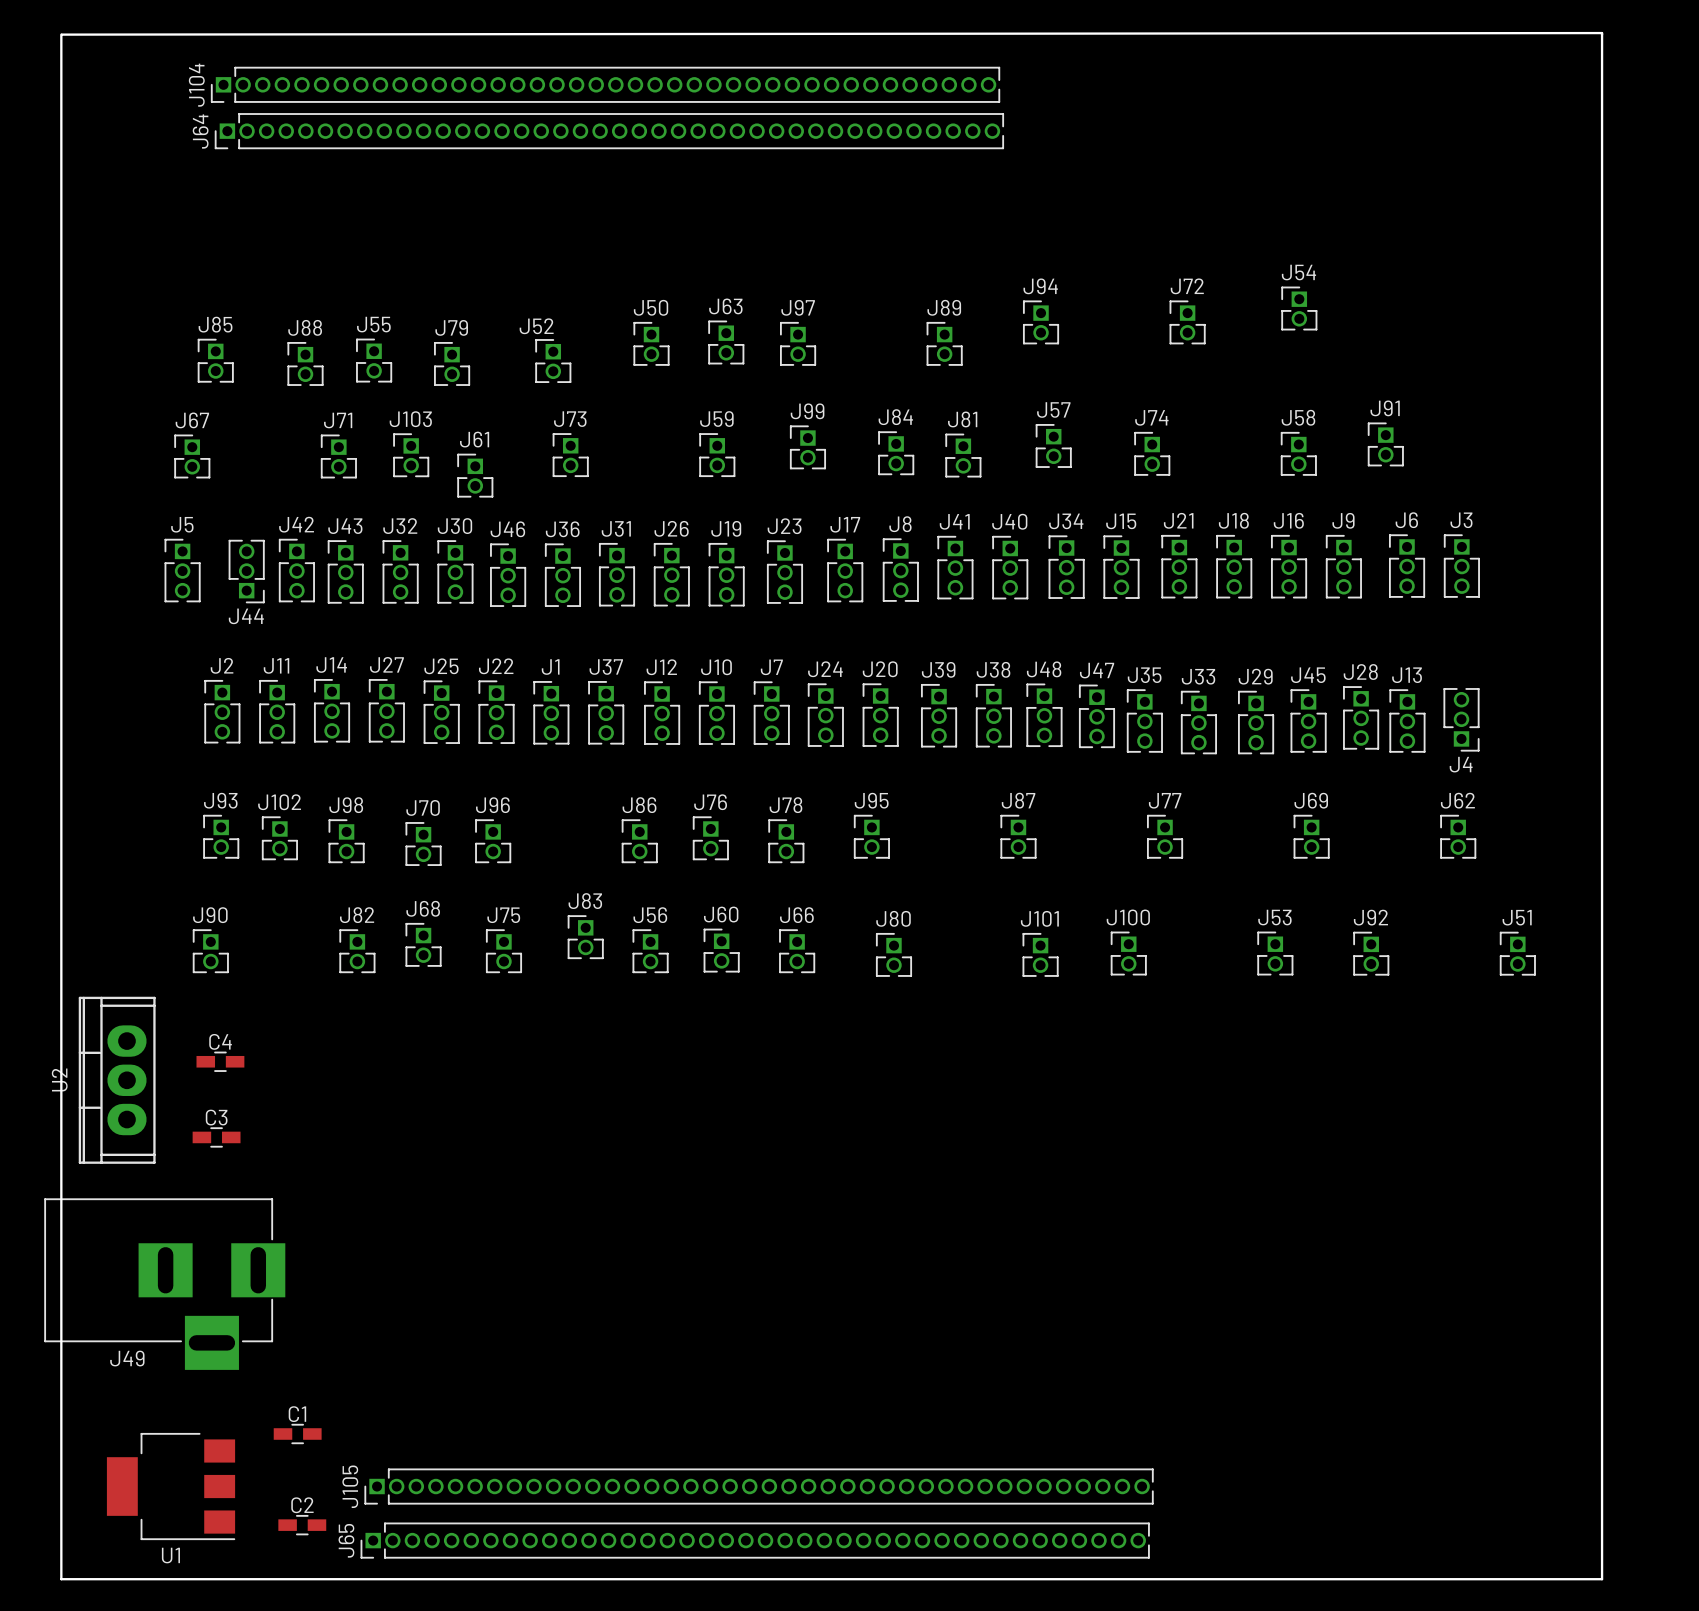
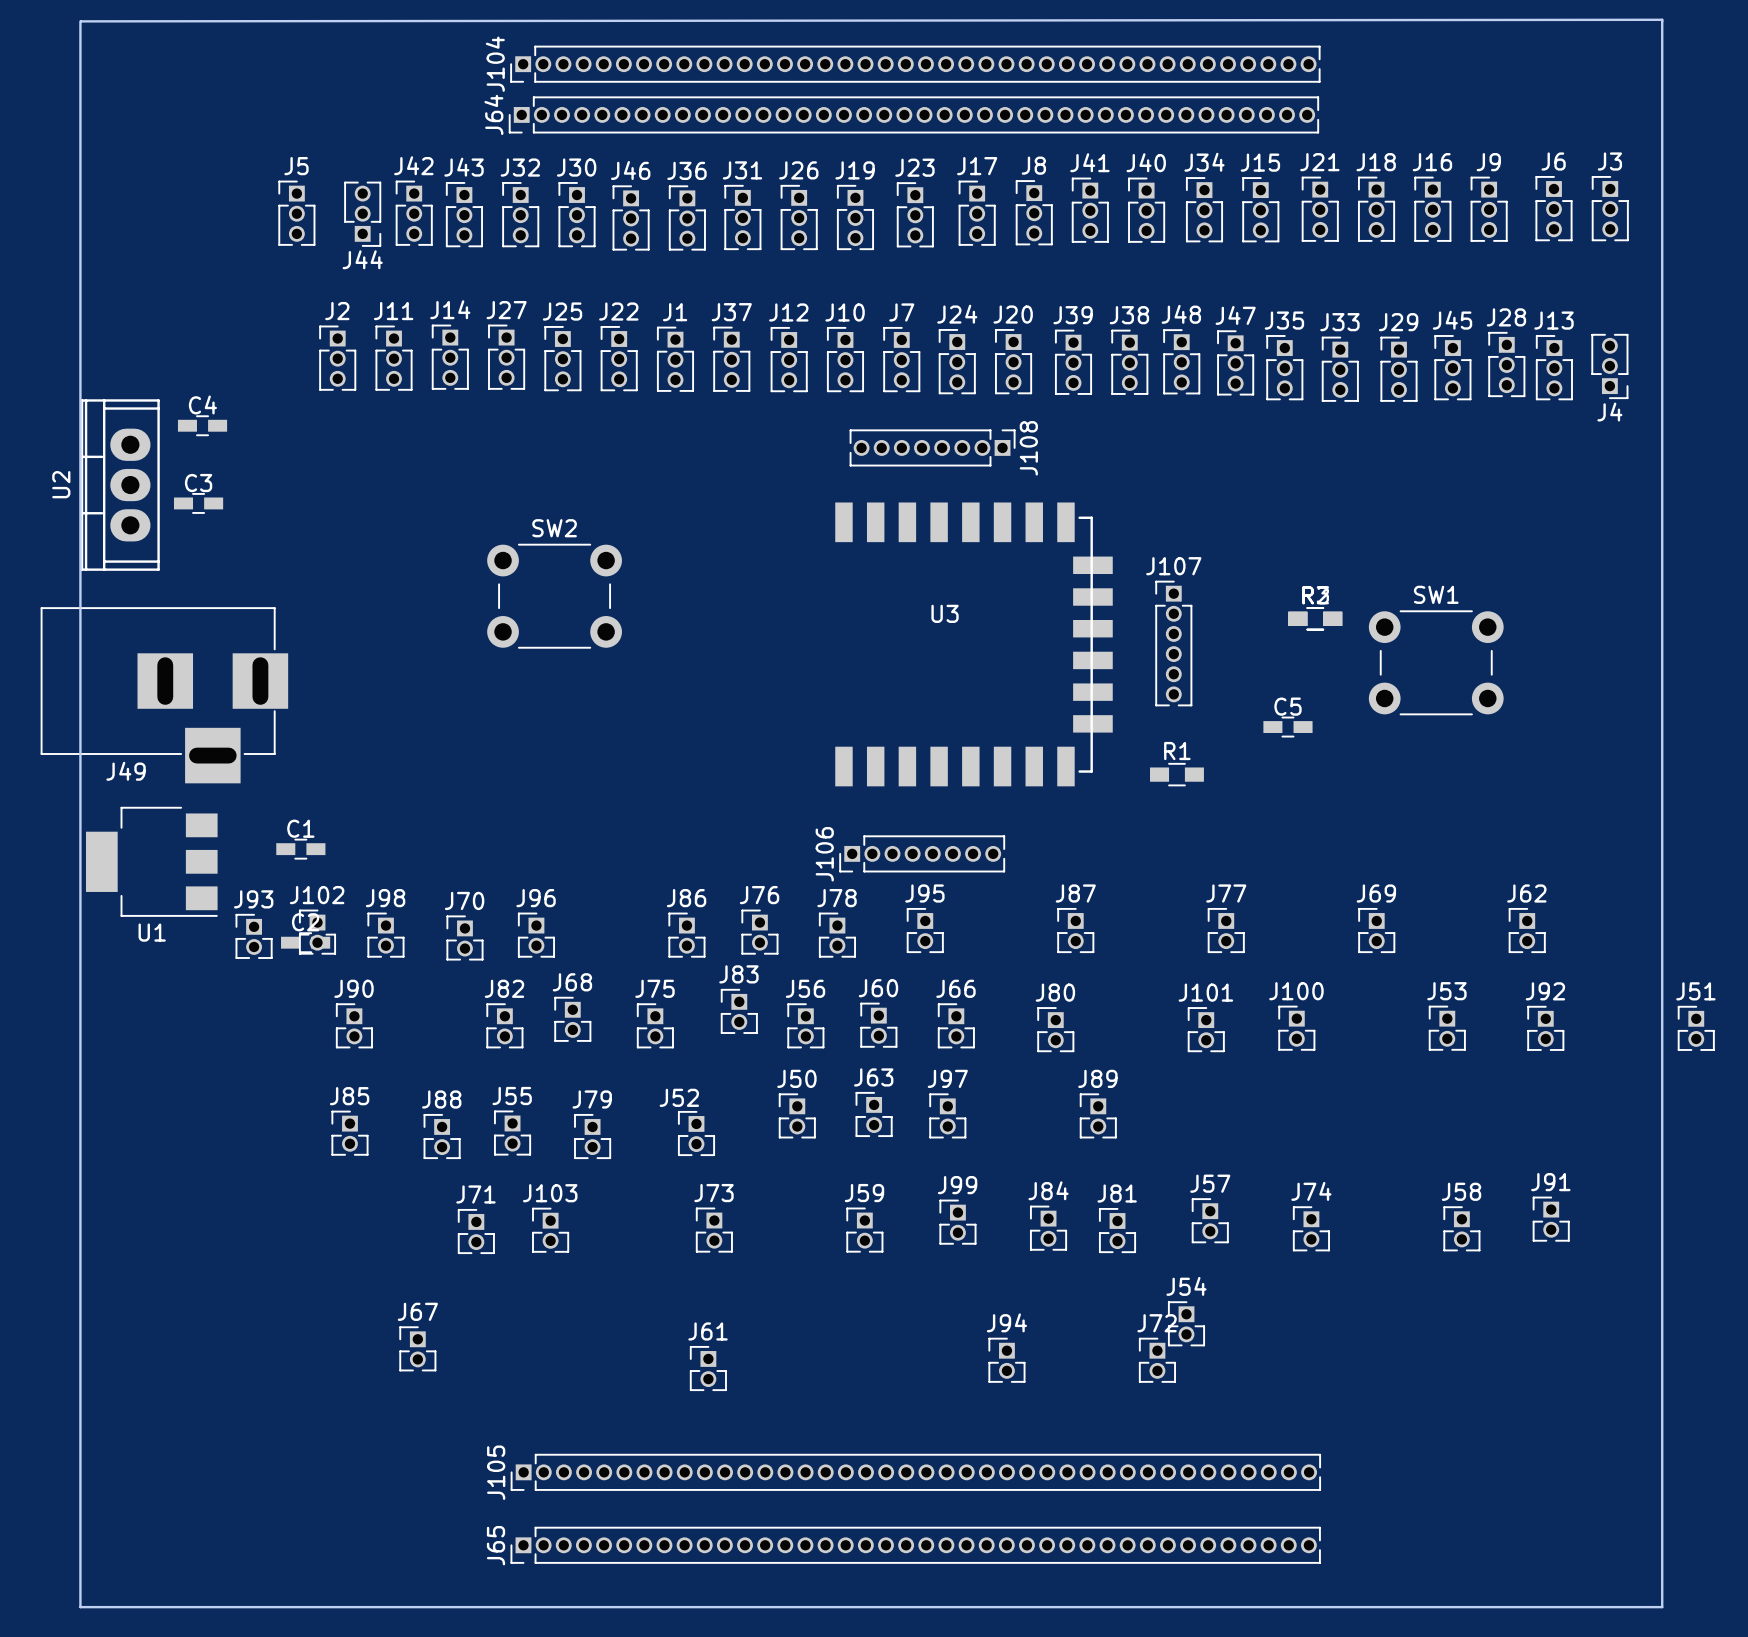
J104 position: (605, 84) -> (915, 64)
J64 position: (609, 131) -> (913, 114)
J54 position: (1299, 308) -> (1186, 1323)
J94 position: (1041, 322) -> (1006, 1360)
J72 position: (1187, 322) -> (1157, 1360)
J63 position: (726, 342) -> (874, 1114)
J50 position: (651, 343) -> (797, 1115)
J97 position: (798, 343) -> (947, 1115)
J89 position: (944, 343) -> (1098, 1115)
J85 position: (215, 360) -> (349, 1133)
J55 position: (374, 360) -> (512, 1133)
J52 position: (553, 361) -> (696, 1133)
J88 position: (305, 363) -> (442, 1136)
J79 position: (452, 363) -> (592, 1136)
J91 position: (1385, 444) -> (1551, 1219)
J57 position: (1053, 445) -> (1210, 1220)
J99 position: (807, 447) -> (957, 1222)
J108: none -> (932, 447)
J84 position: (896, 453) -> (1048, 1228)
J74 position: (1152, 453) -> (1311, 1228)
J58 position: (1298, 453) -> (1461, 1228)
J103 position: (411, 455) -> (550, 1230)
J73 position: (570, 455) -> (714, 1230)
J59 position: (717, 455) -> (864, 1230)
J81 position: (963, 455) -> (1117, 1230)
J67 position: (192, 456) -> (417, 1348)
J71 position: (338, 456) -> (476, 1231)
J61 position: (475, 475) -> (708, 1368)
J21 position: (1179, 566) -> (1320, 209)
J18 position: (1234, 566) -> (1376, 209)
J16 position: (1289, 566) -> (1432, 209)
J9 position: (1343, 566) -> (1489, 209)
J6 position: (1407, 566) -> (1553, 208)
J3 position: (1461, 566) -> (1610, 208)
J41 position: (955, 567) -> (1090, 210)
J40 position: (1010, 567) -> (1146, 210)
J34 position: (1066, 567) -> (1204, 209)
J15 position: (1121, 567) -> (1260, 209)
J5 position: (182, 570) -> (296, 213)
J42 position: (296, 570) -> (414, 213)
J17 position: (845, 570) -> (977, 213)
J8 position: (900, 570) -> (1034, 212)
J44 position: (246, 571) -> (362, 214)
J43 position: (345, 571) -> (464, 214)
J32 position: (400, 571) -> (520, 214)
J30 position: (455, 571) -> (577, 214)
J23 position: (784, 572) -> (915, 214)
J31 position: (617, 574) -> (742, 217)
J26 position: (671, 574) -> (799, 217)
J19 position: (726, 574) -> (855, 217)
J46 position: (508, 575) -> (631, 217)
J36 position: (562, 575) -> (687, 217)
SW2: none -> (554, 596)
part: none -> (1315, 618)
part: none -> (1315, 618)
J107: none -> (1173, 643)
U3: none -> (974, 644)
SW1: none -> (1436, 662)
J14 position: (332, 710) -> (450, 357)
J27 position: (386, 710) -> (506, 357)
J2 position: (222, 711) -> (337, 358)
J11 position: (277, 711) -> (394, 358)
J25 position: (441, 712) -> (562, 358)
J22 position: (496, 712) -> (619, 358)
J1 position: (551, 712) -> (675, 359)
J37 position: (606, 712) -> (731, 359)
J12 position: (662, 713) -> (789, 359)
J10 position: (716, 713) -> (845, 359)
J7 position: (771, 713) -> (901, 359)
J24 position: (825, 715) -> (957, 361)
J20 position: (880, 715) -> (1013, 361)
J39 position: (939, 715) -> (1073, 362)
J38 position: (993, 715) -> (1129, 362)
J48 position: (1044, 715) -> (1181, 361)
J47 position: (1096, 716) -> (1235, 362)
J28 position: (1361, 717) -> (1506, 364)
J4 position: (1461, 719) -> (1609, 366)
J35 position: (1144, 720) -> (1284, 367)
J45 position: (1308, 720) -> (1452, 367)
J13 position: (1407, 720) -> (1554, 367)
C5: none -> (1287, 727)
J33 position: (1198, 722) -> (1340, 369)
J29 position: (1256, 722) -> (1398, 369)
R1: none -> (1176, 774)
J93 position: (221, 836) -> (254, 936)
J95 position: (871, 836) -> (925, 930)
J87 position: (1018, 836) -> (1075, 930)
J77 position: (1165, 836) -> (1226, 930)
J69 position: (1311, 836) -> (1376, 930)
J62 position: (1458, 836) -> (1527, 930)
J102 position: (279, 838) -> (317, 932)
J76 position: (710, 838) -> (759, 932)
J98 position: (346, 841) -> (385, 935)
J96 position: (493, 841) -> (536, 935)
J86 position: (639, 841) -> (686, 935)
J78 position: (786, 841) -> (837, 935)
J70 position: (423, 844) -> (464, 937)
J106: none -> (922, 853)
J83 position: (585, 937) -> (739, 1011)
J68 position: (423, 944) -> (572, 1019)
J60 position: (721, 950) -> (878, 1025)
J90 position: (210, 951) -> (354, 1025)
J82 position: (357, 951) -> (504, 1025)
J75 position: (503, 951) -> (655, 1025)
J56 position: (650, 951) -> (805, 1025)
J66 position: (797, 951) -> (956, 1025)
J100 position: (1128, 953) -> (1296, 1028)
J53 position: (1275, 953) -> (1447, 1028)
J92 position: (1371, 953) -> (1545, 1028)
J51 position: (1517, 953) -> (1696, 1028)
J80 position: (893, 954) -> (1055, 1029)
J101 position: (1040, 954) -> (1206, 1029)
C4 position: (220, 1061) -> (202, 425)
U2 position: (117, 1080) -> (120, 485)
C3 position: (216, 1137) -> (198, 503)
J49 position: (164, 1284) -> (164, 695)
C1 position: (297, 1434) -> (300, 849)
U1 position: (171, 1486) -> (151, 861)
J105 position: (759, 1486) -> (915, 1472)
C2 position: (302, 1525) -> (305, 942)
J65 position: (755, 1540) -> (915, 1545)

